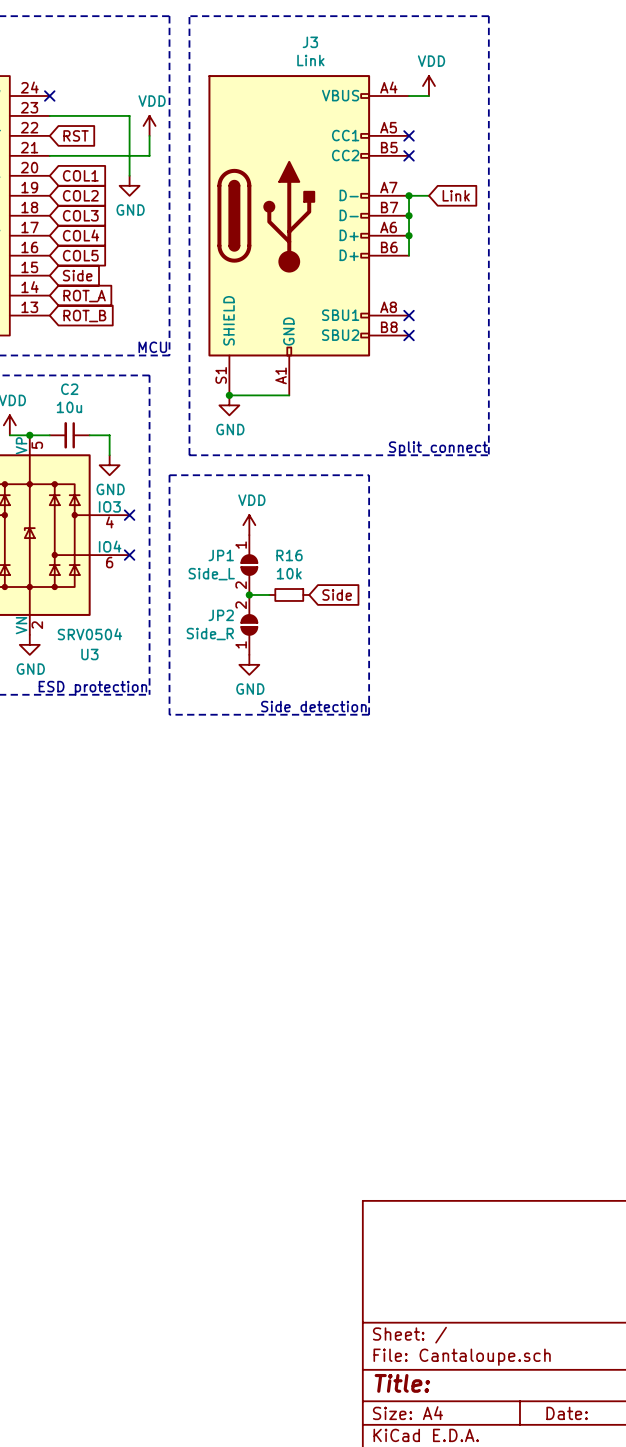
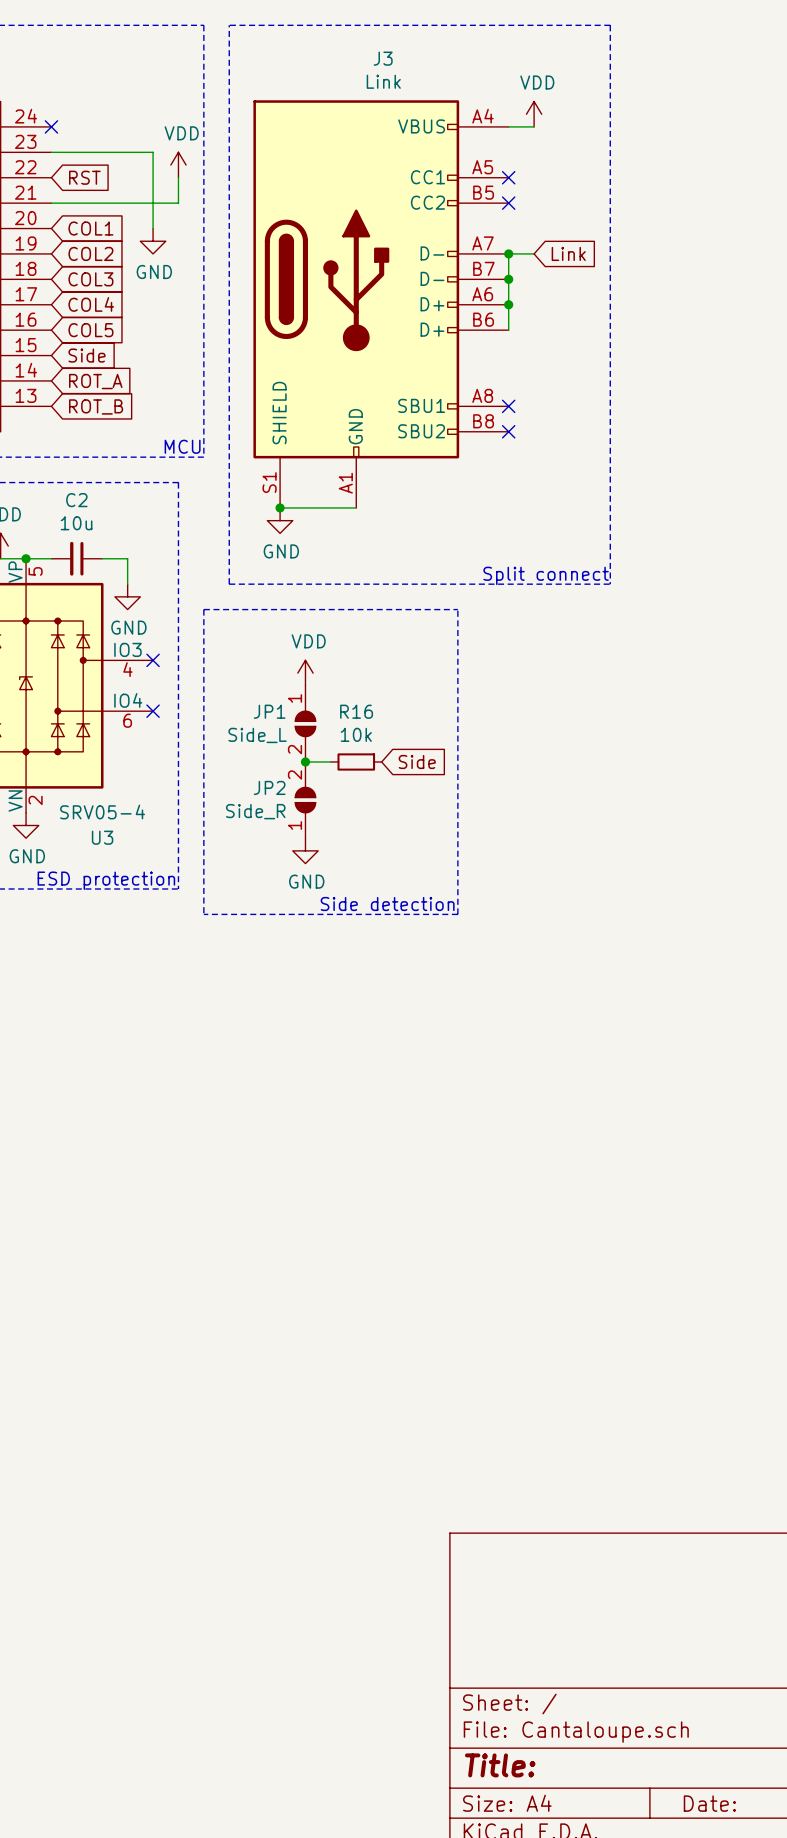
U3 value: SRV0504 (89, 634) -> SRV05-4 (102, 812)

